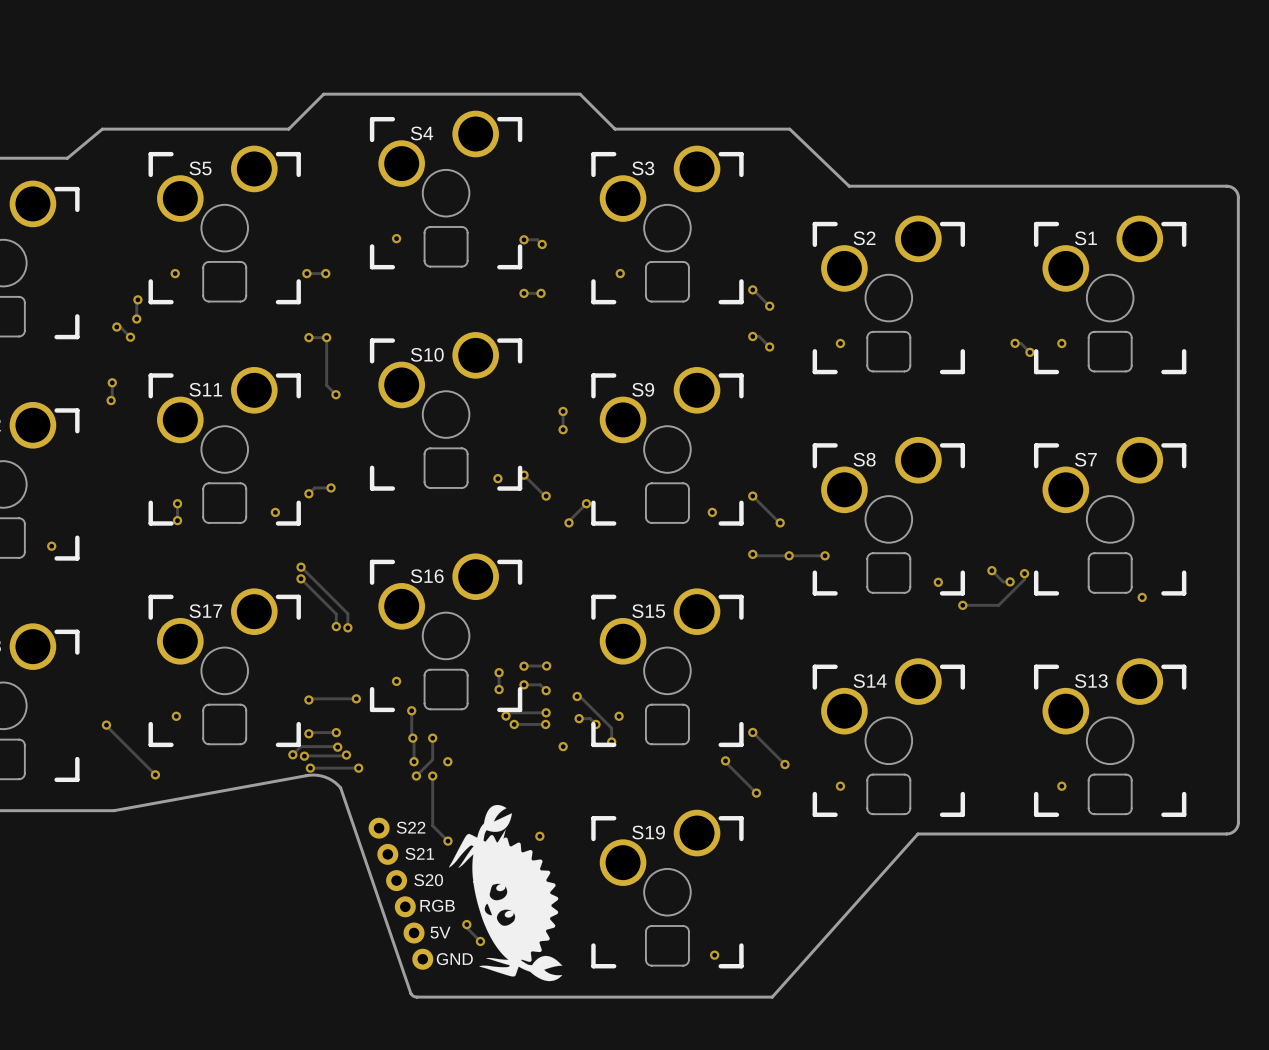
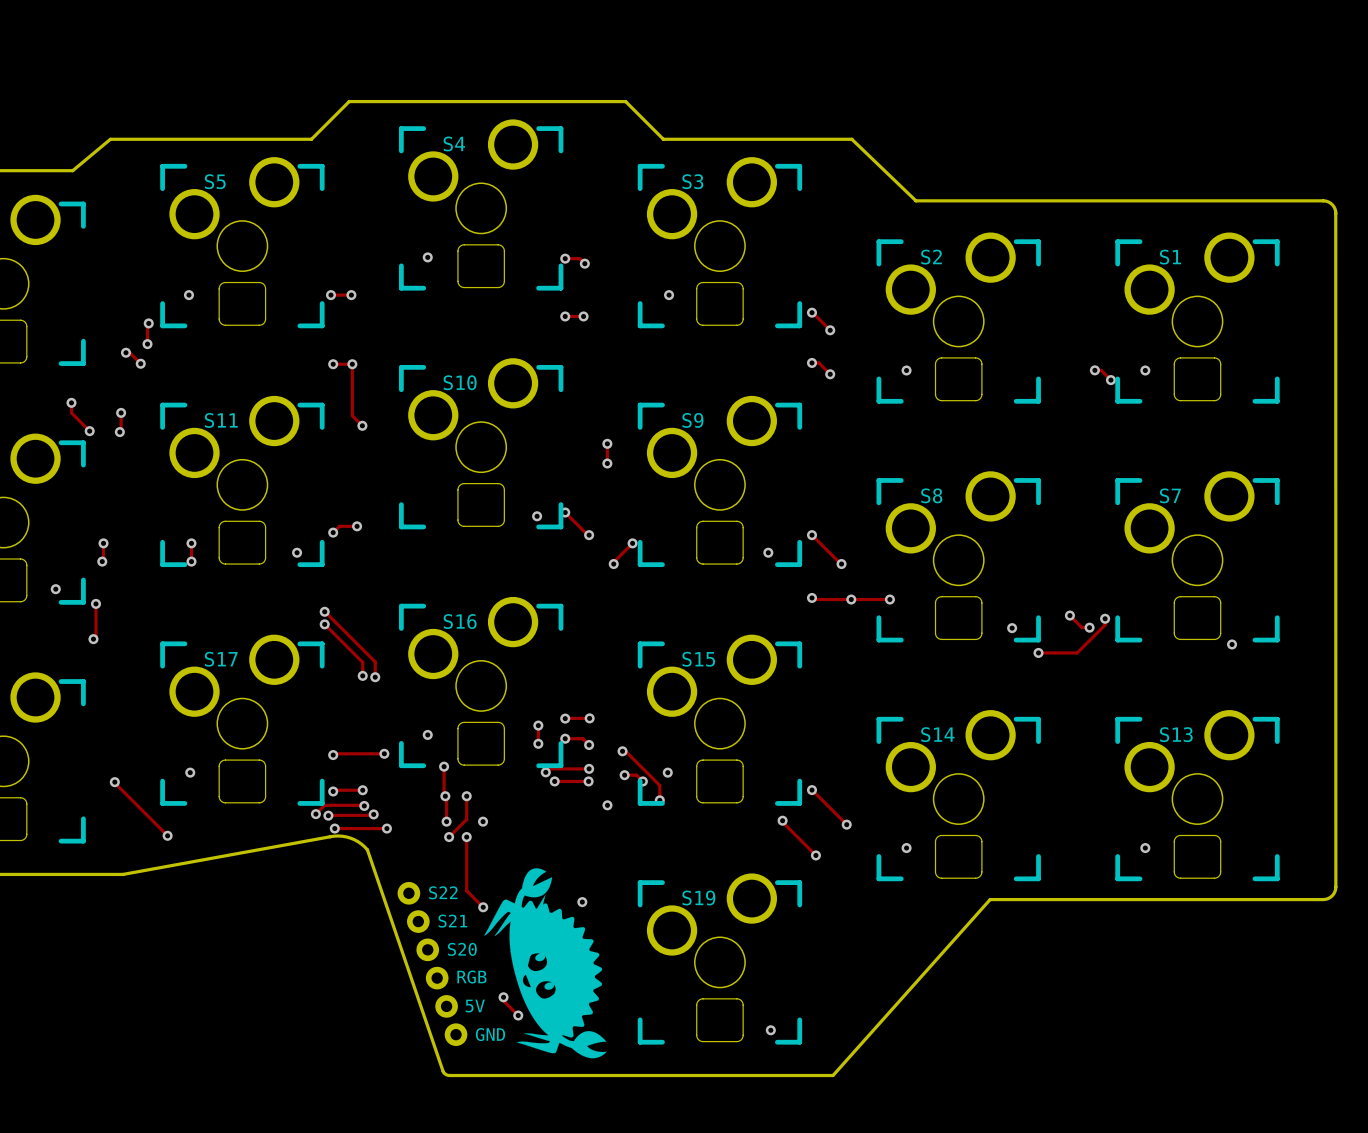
track: none -> (71, 402) (71, 412) (89, 431)
via: none -> (71, 402)
via: none -> (89, 431)
track: none -> (103, 543) (102, 561)
via: none -> (103, 543)
via: none -> (102, 561)
track: none -> (95, 603) (95, 636) (93, 639)
via: none -> (95, 603)
via: none -> (93, 639)

